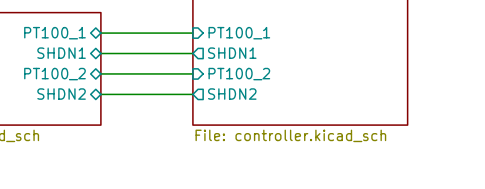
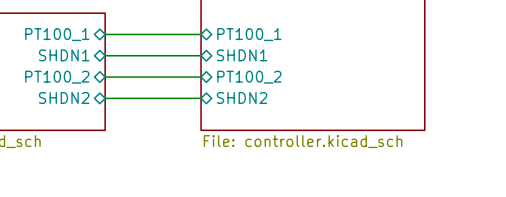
sheet pin shape: input (239, 33) -> bidirectional (249, 34)
sheet pin shape: output (232, 53) -> bidirectional (242, 55)
sheet pin shape: input (239, 74) -> bidirectional (249, 77)
sheet pin shape: output (232, 94) -> bidirectional (242, 97)

